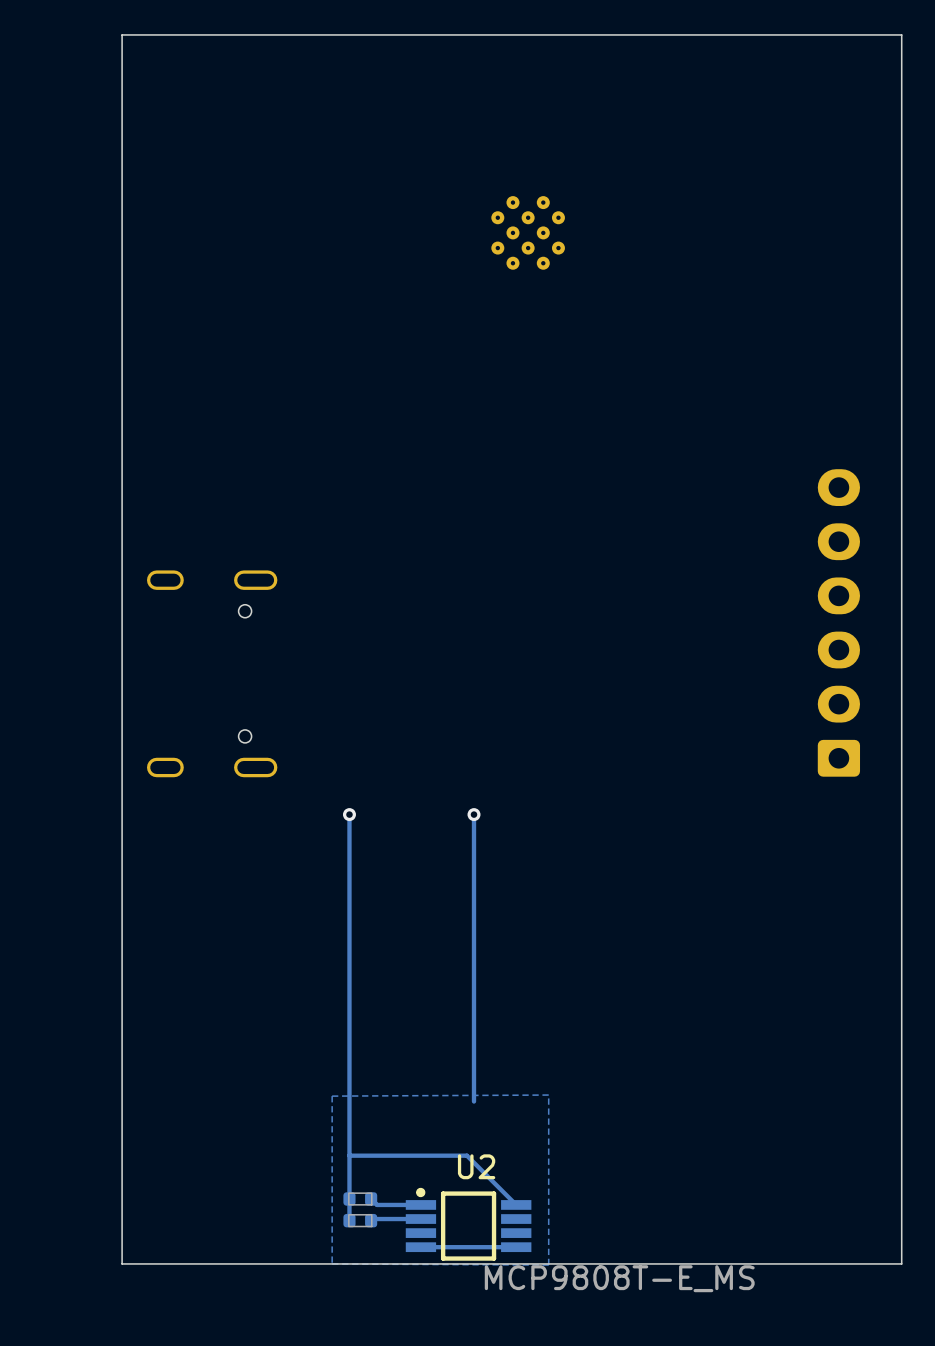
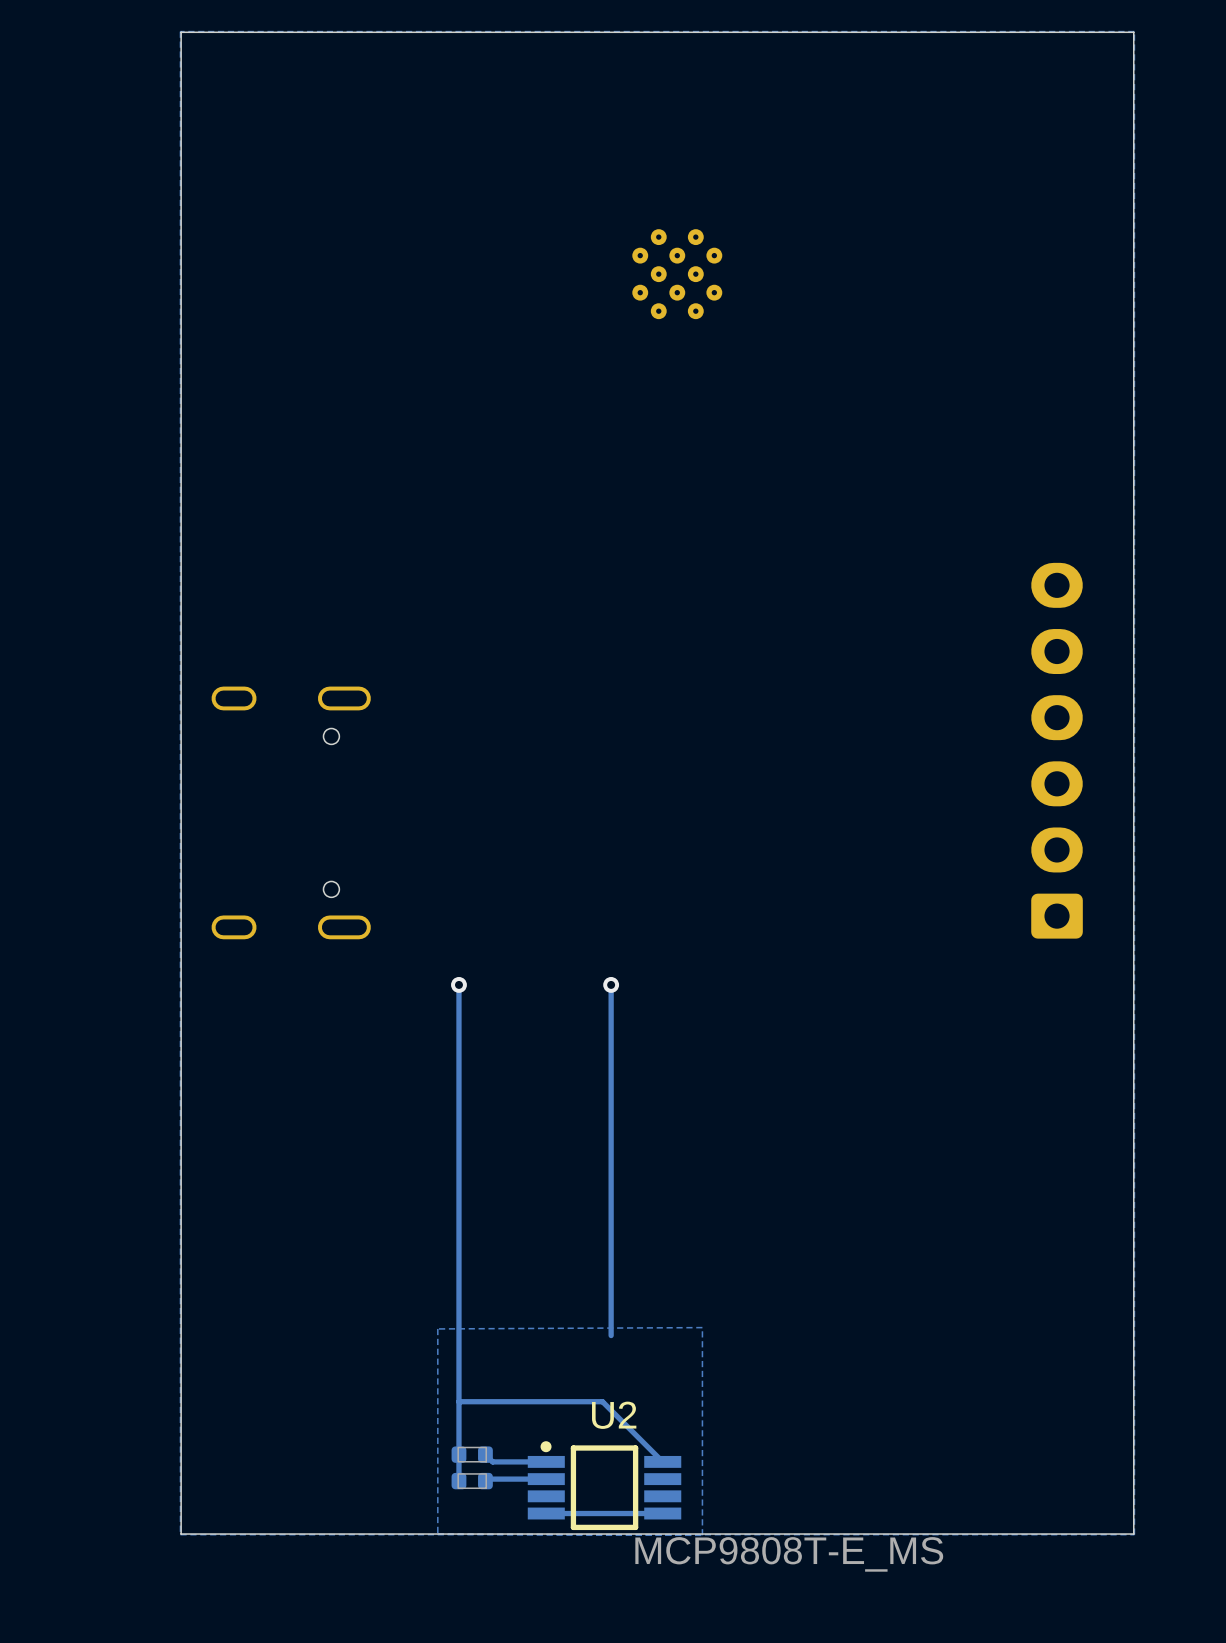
zone outline: none -> (1134, 31) (180, 31) (180, 1534) (1134, 1534) (1134, 31)

